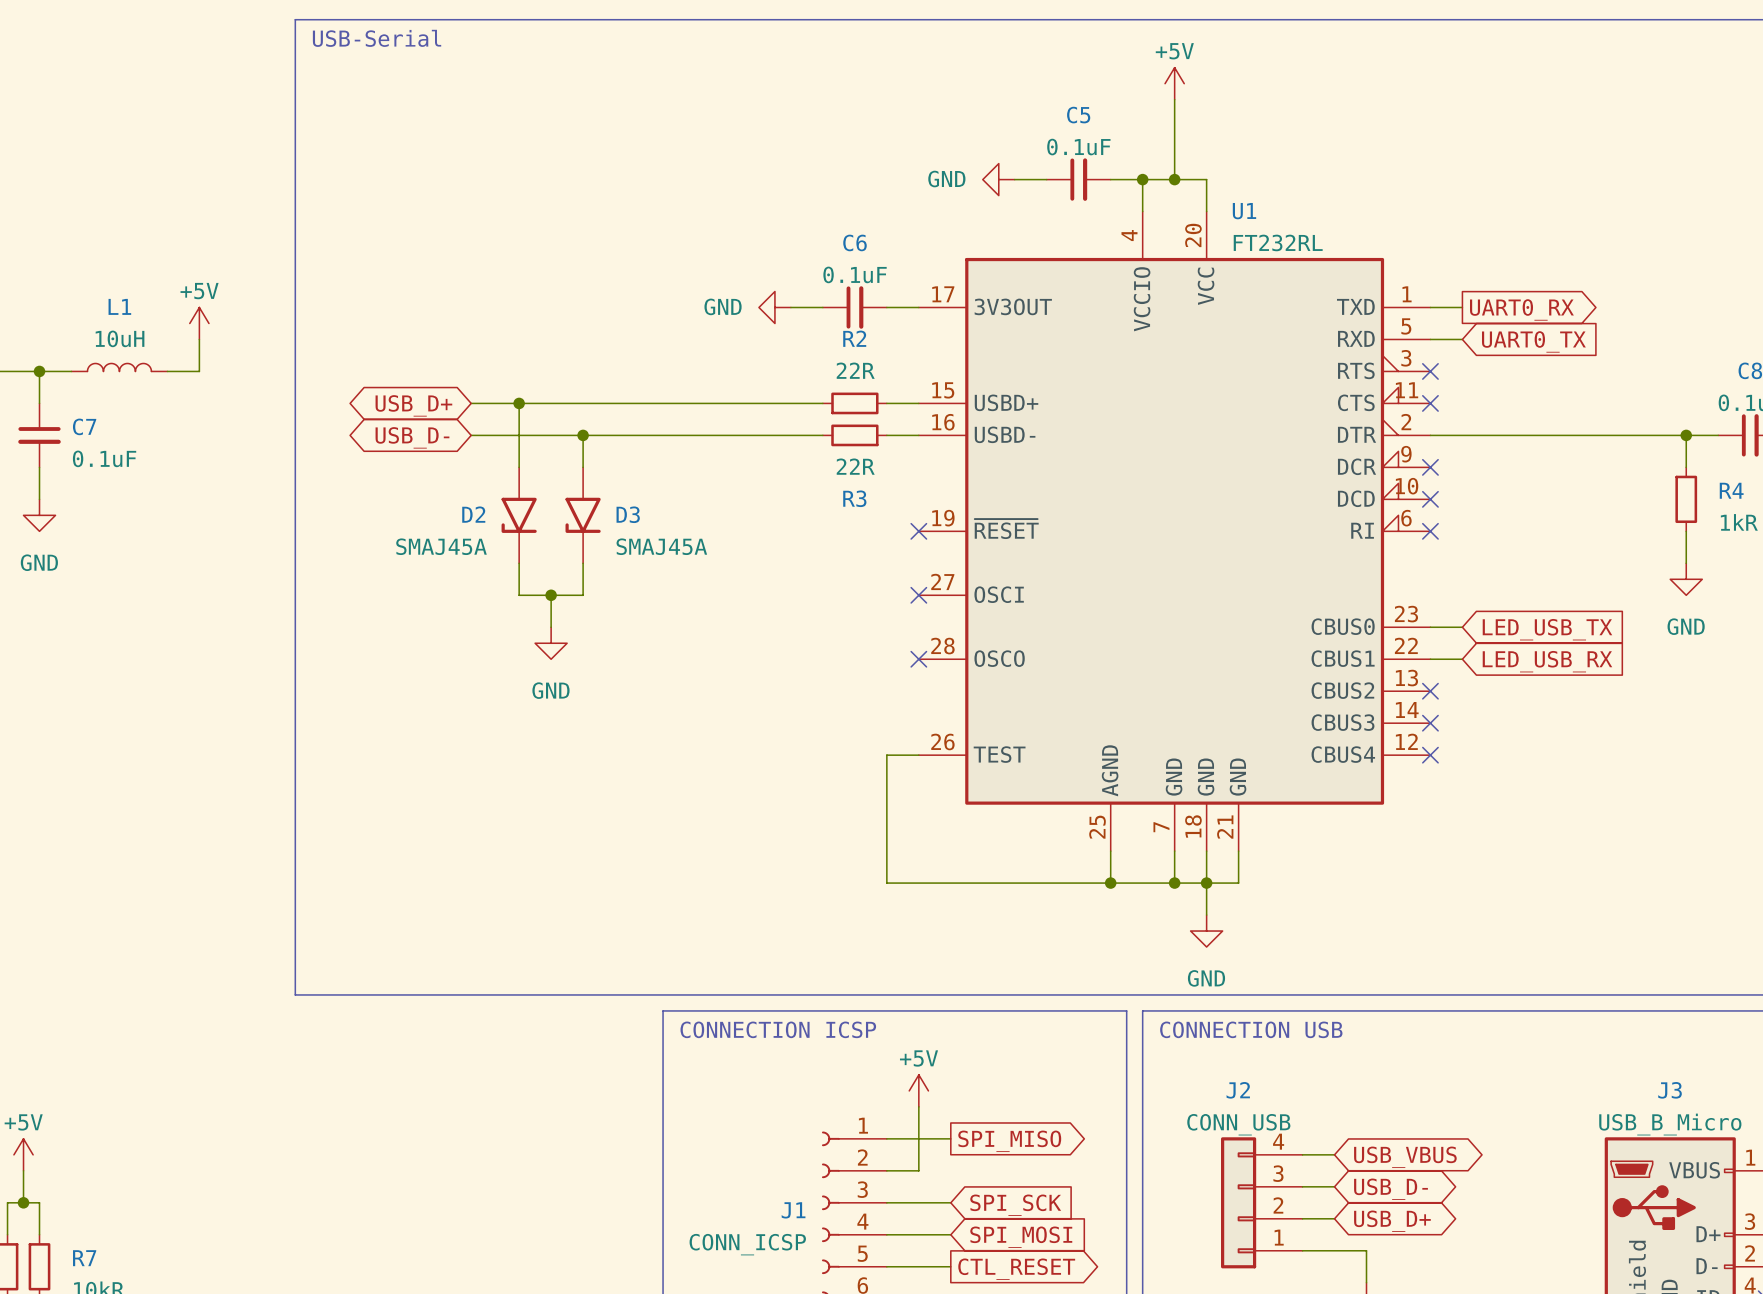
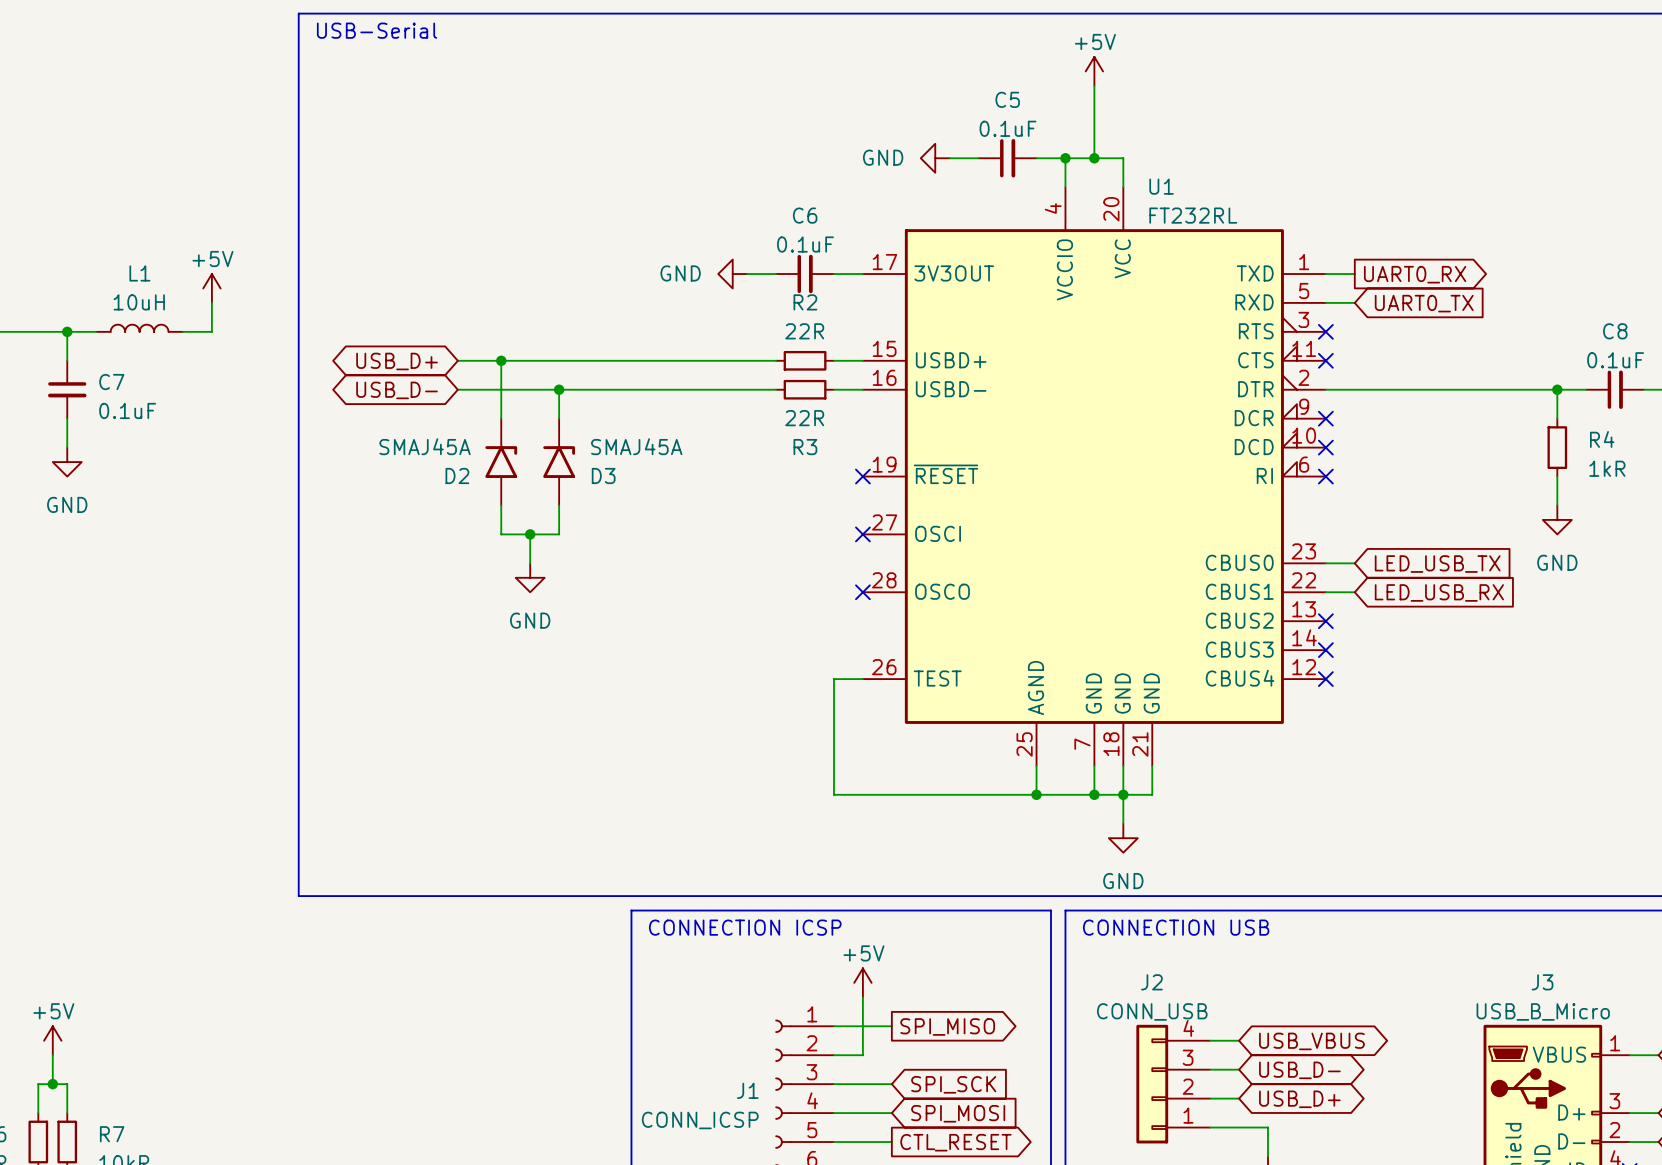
D2 rotation: 0° (519, 515) -> 180° (501, 462)
D3 rotation: 0° (583, 515) -> 180° (559, 462)
D2 value position: SMAJ45A (441, 546) -> SMAJ45A (425, 446)
D3 value position: SMAJ45A (661, 546) -> SMAJ45A (636, 446)

